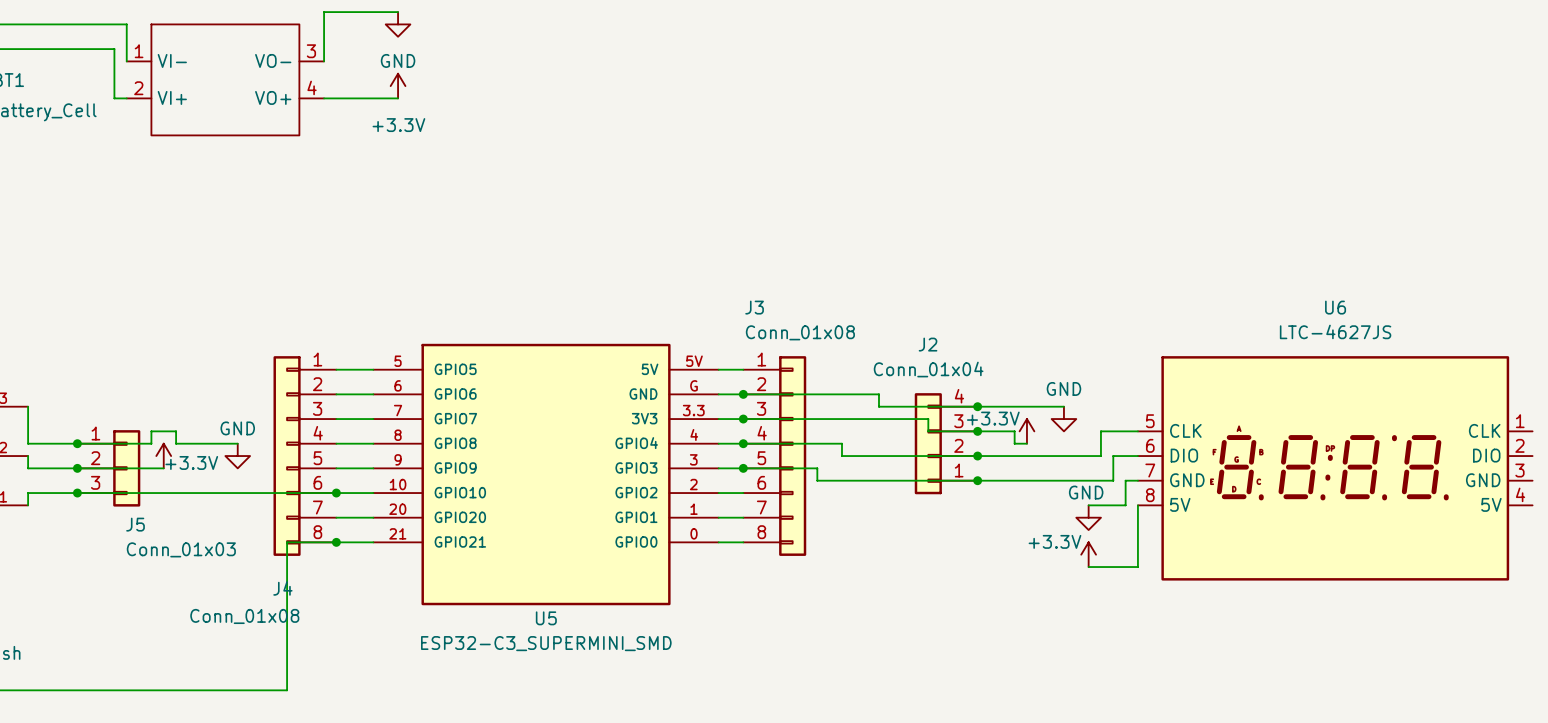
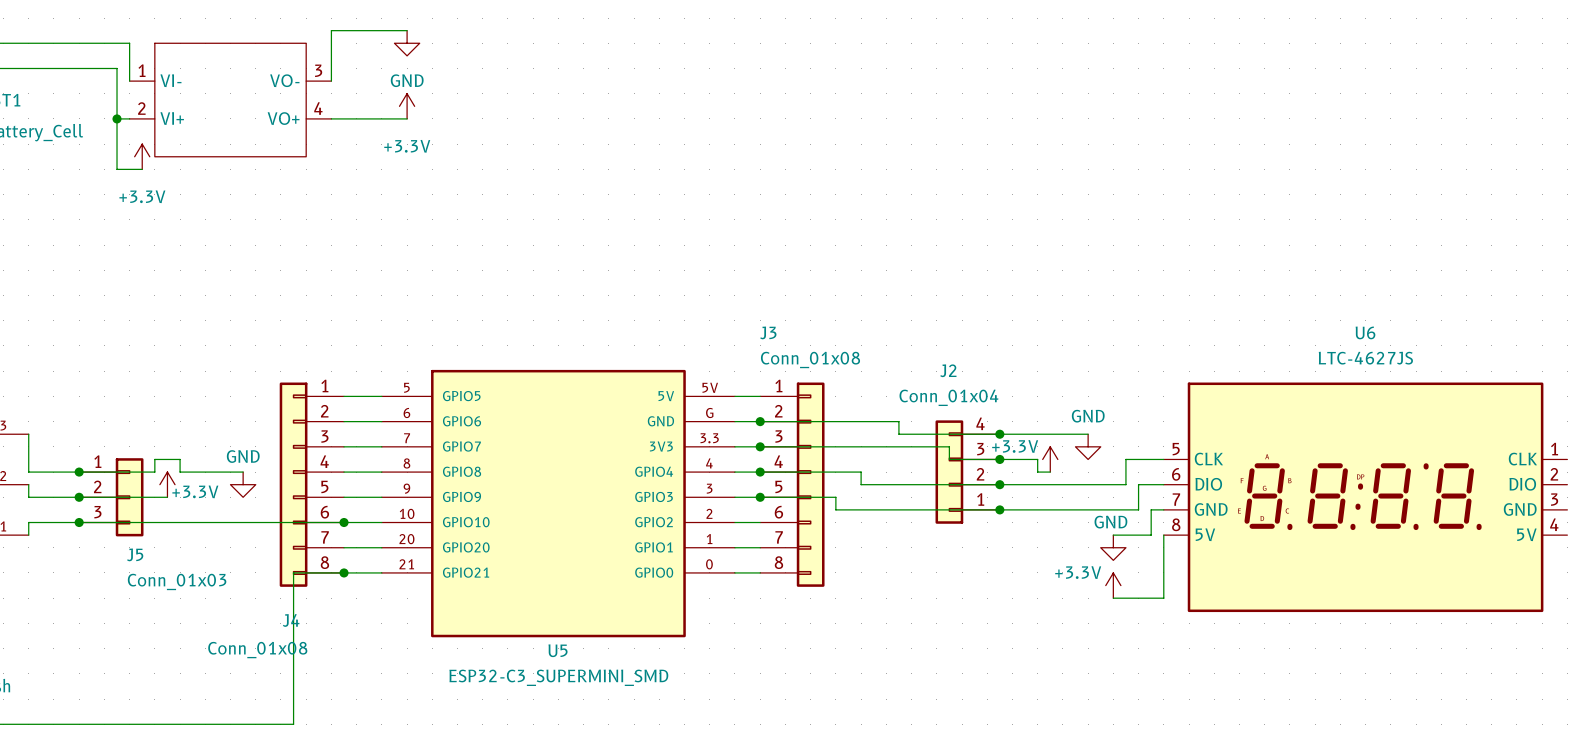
wire: none -> (117, 118) (117, 169) (142, 169)
junction: none -> (117, 118)
power symbol: none -> +3.3V (142, 156)

